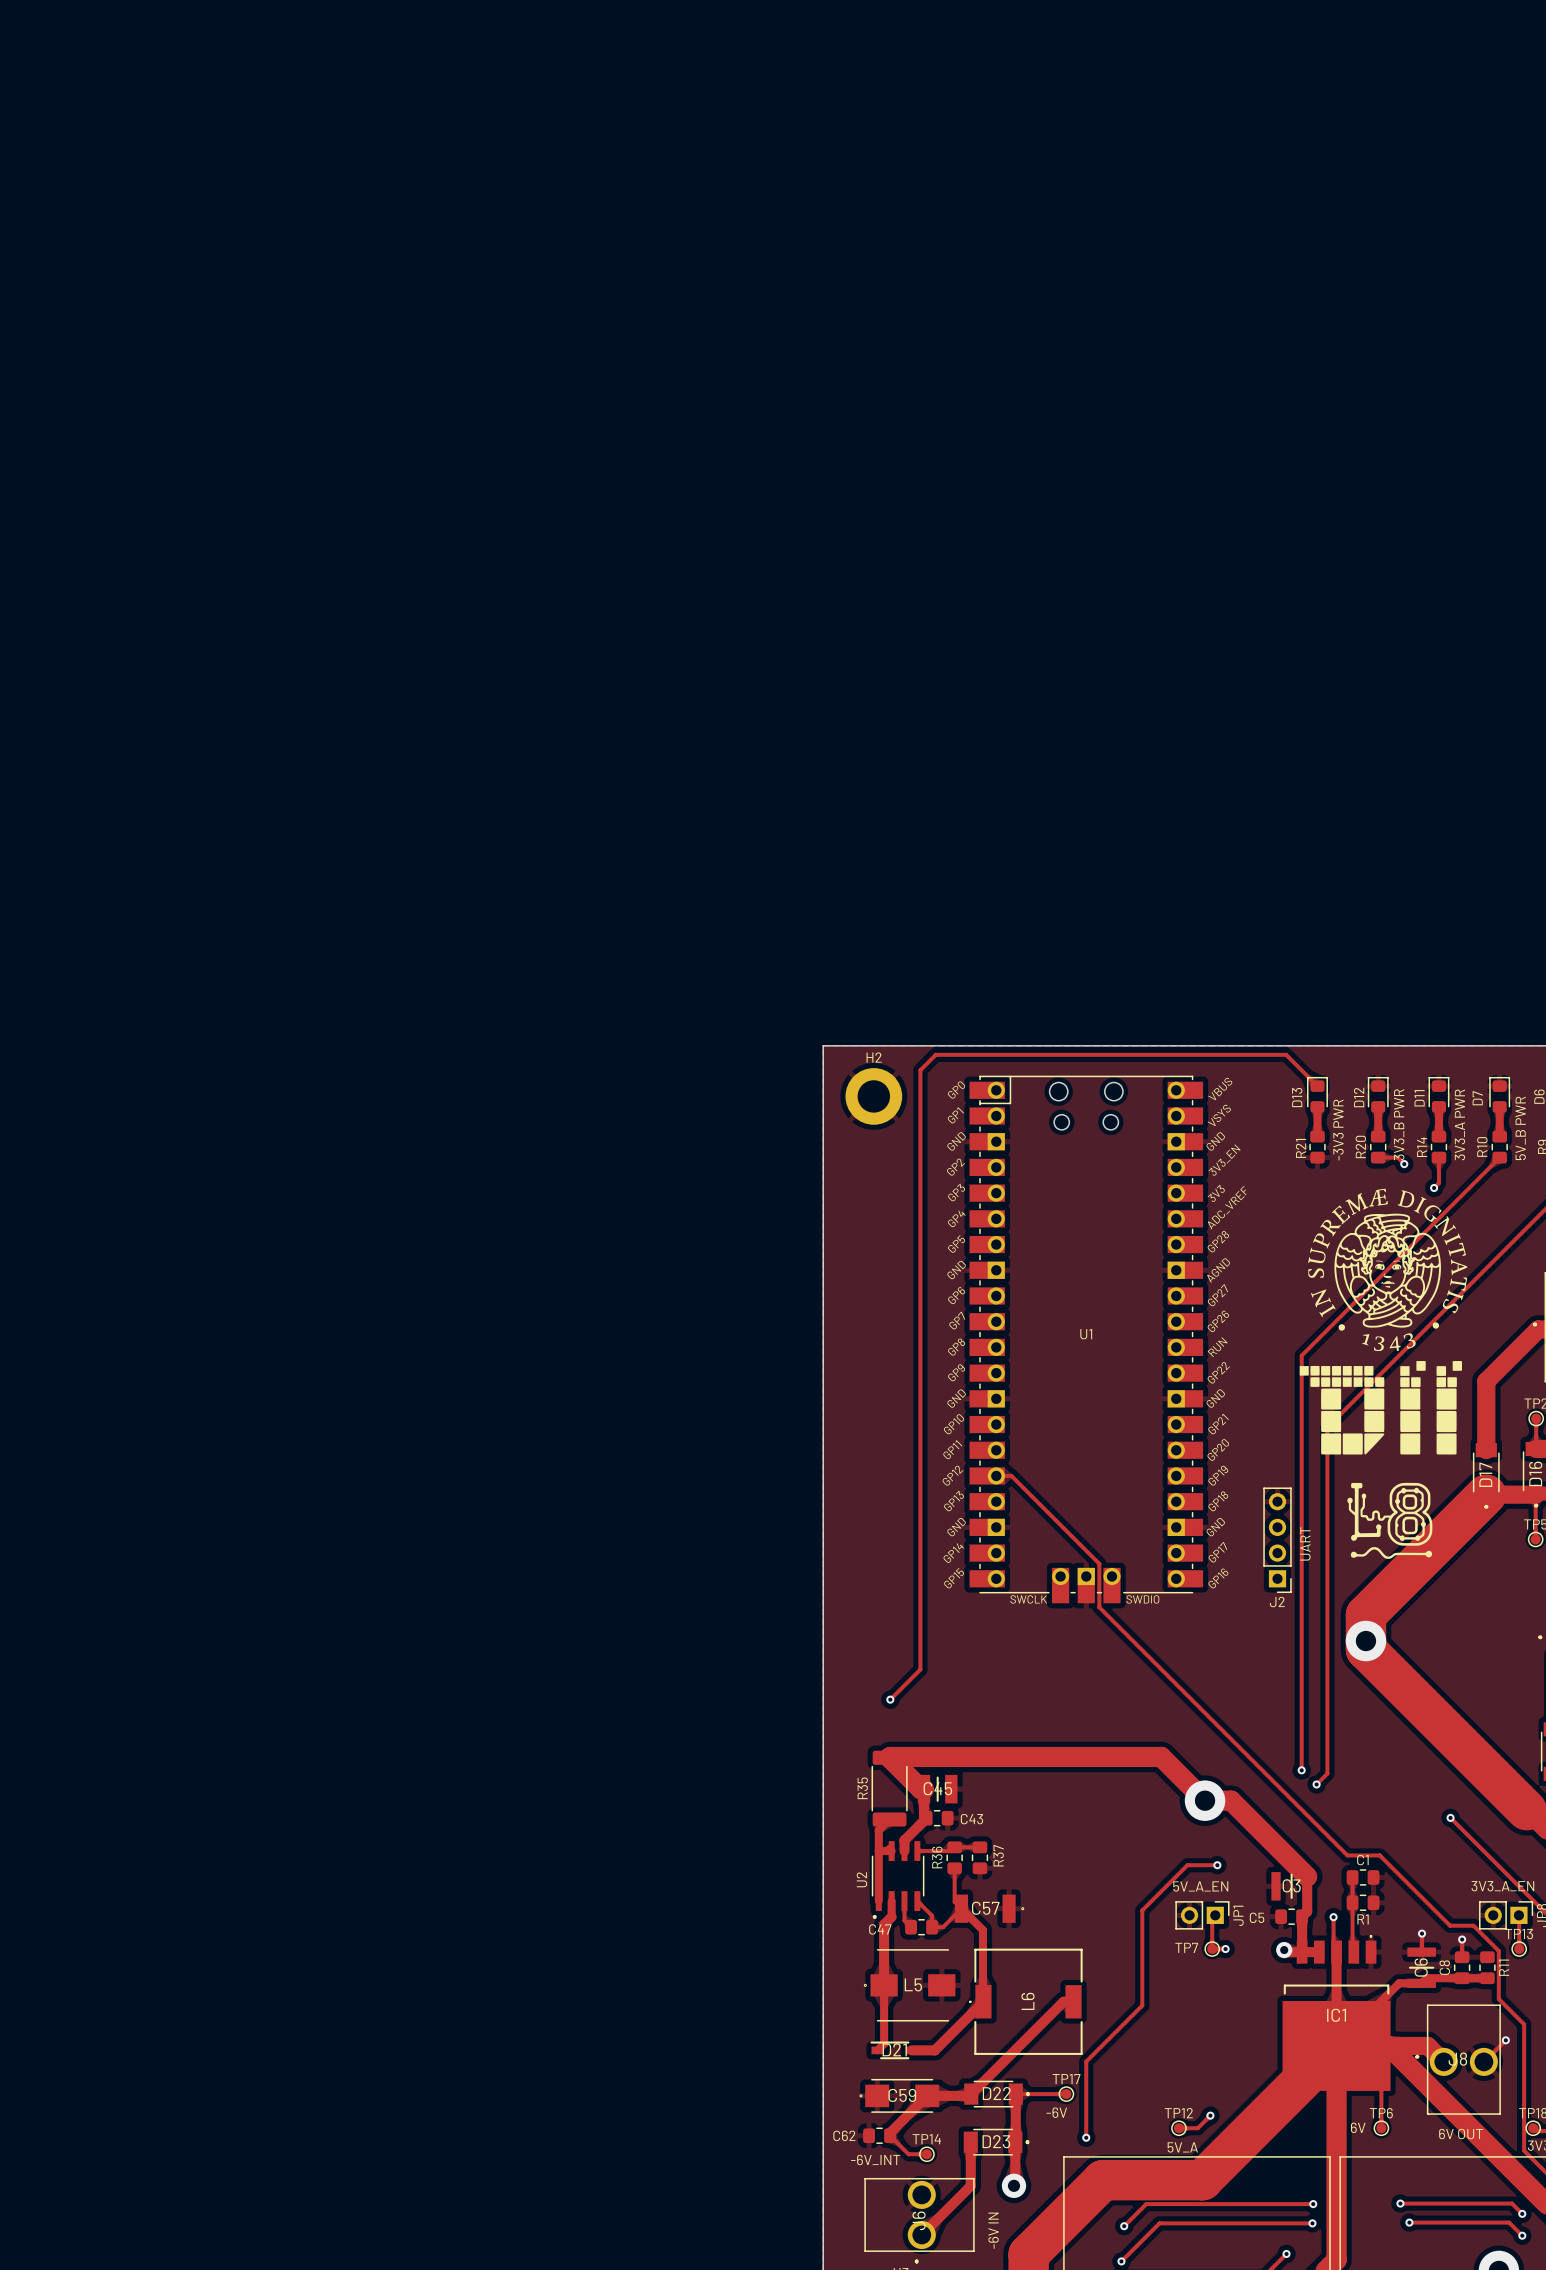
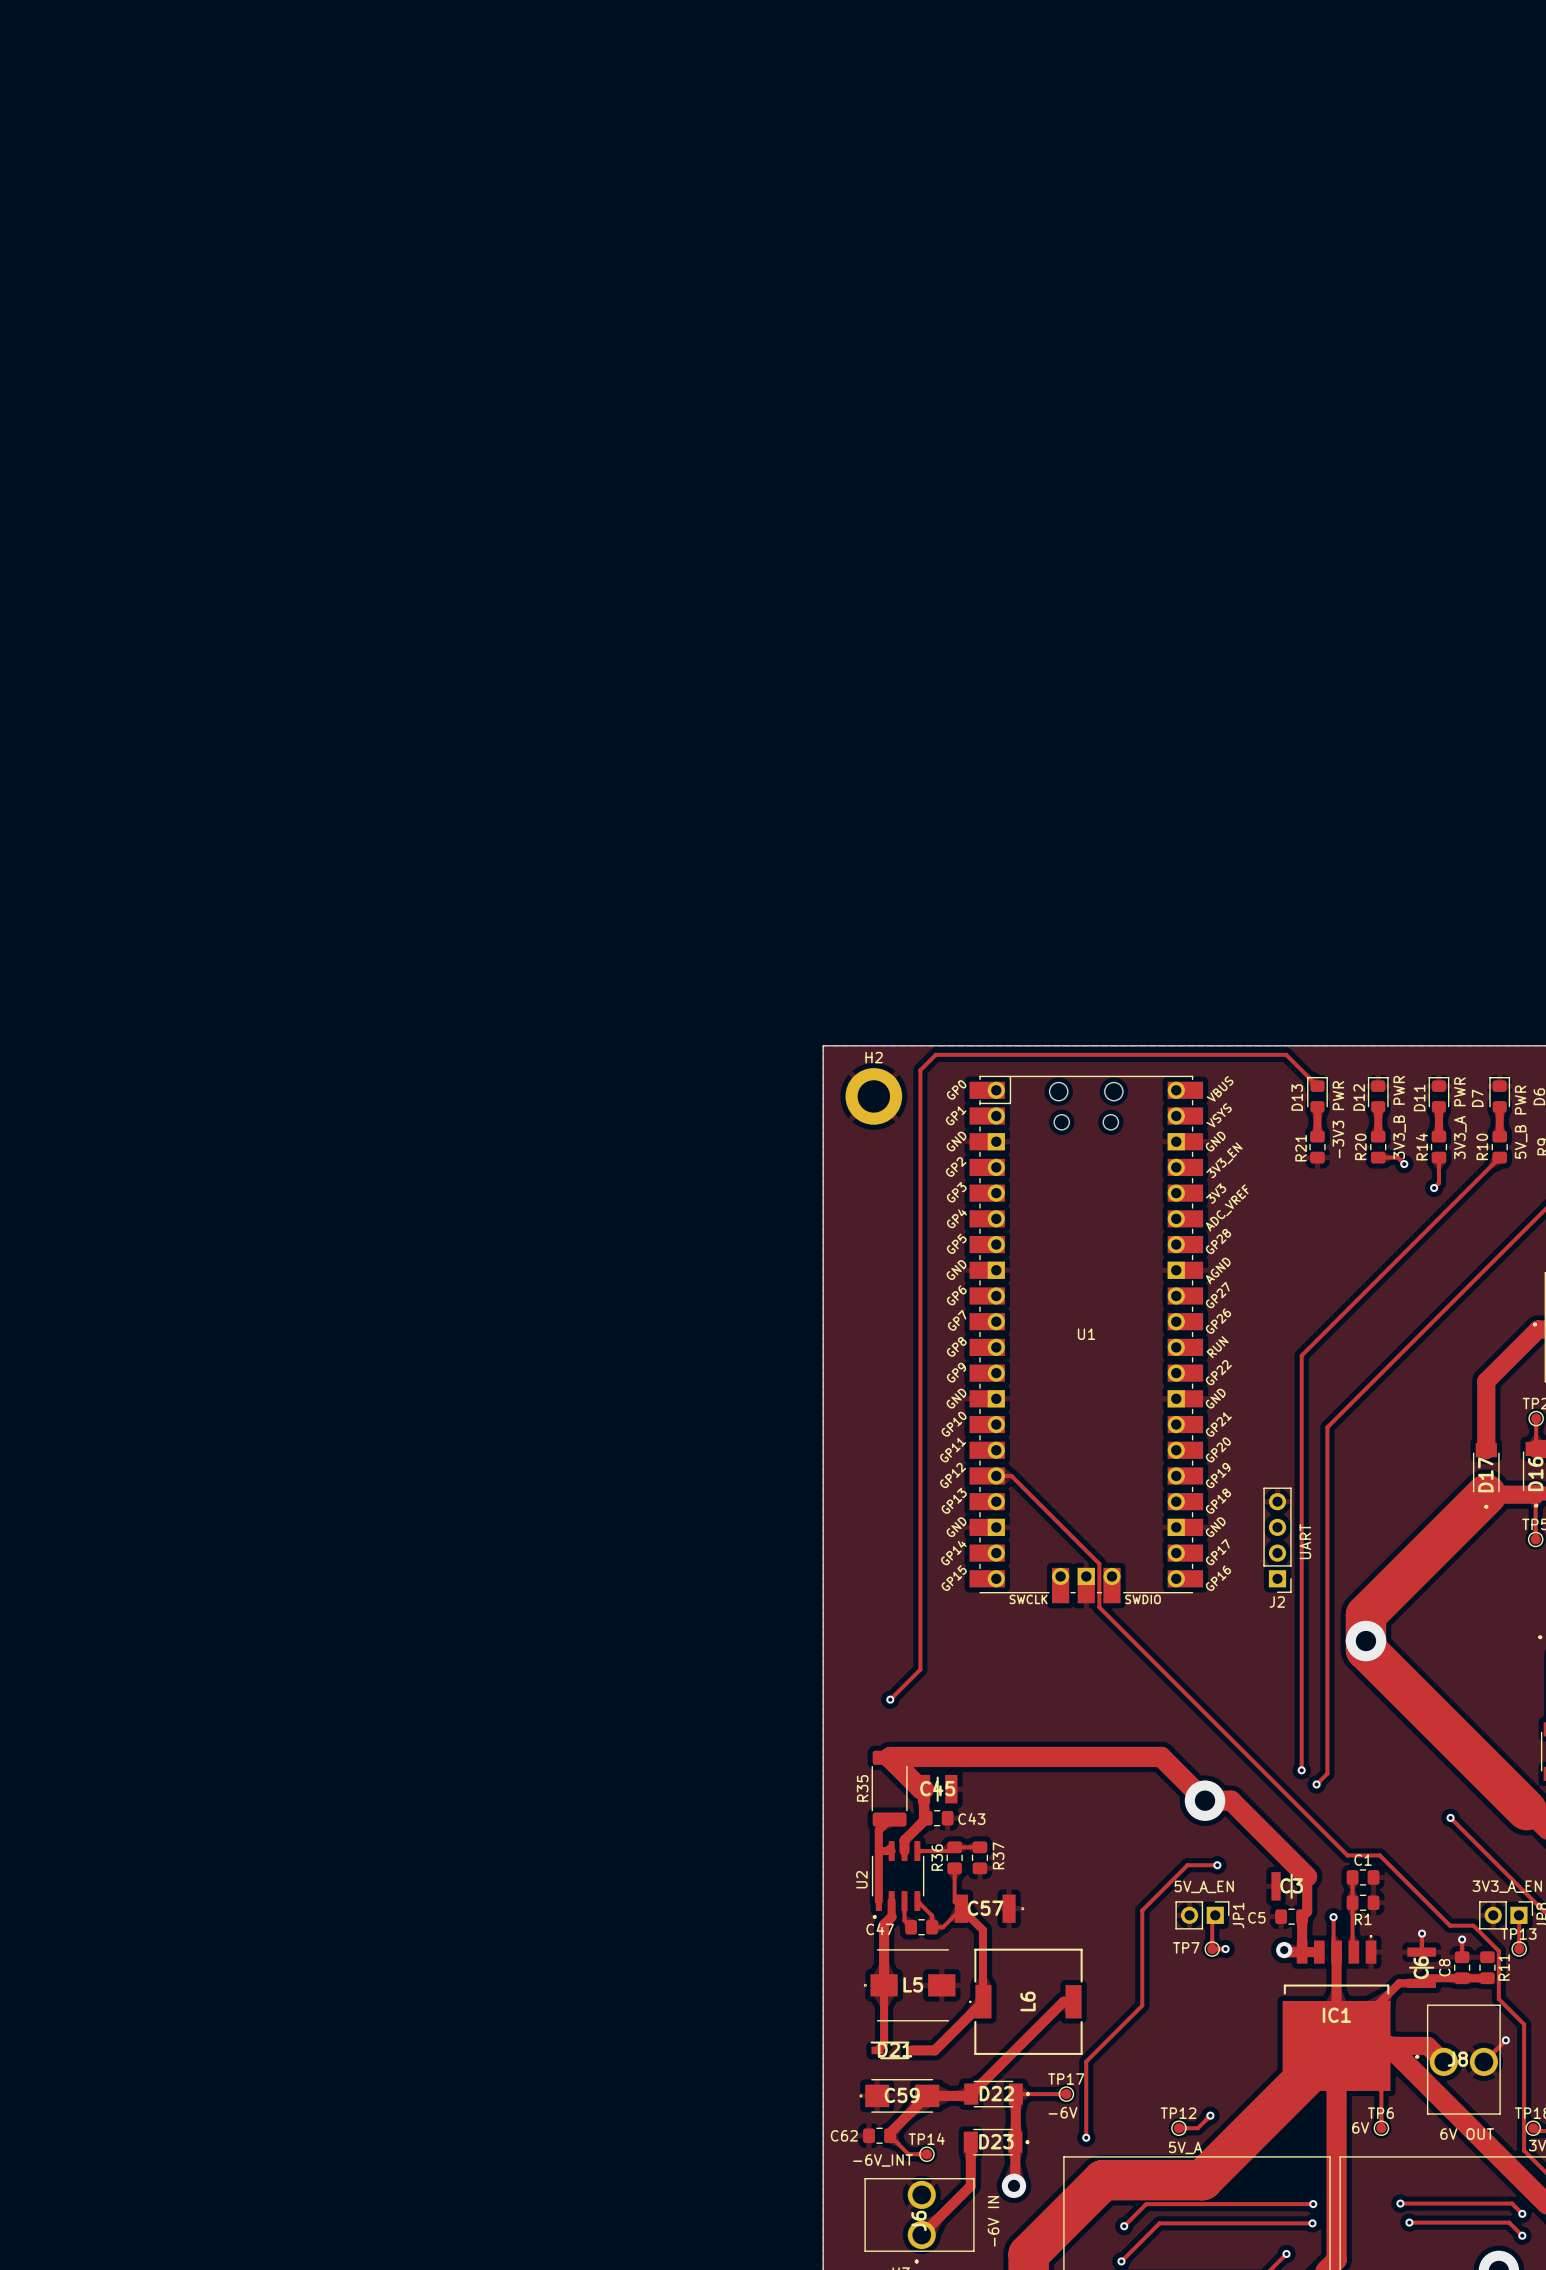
drawing: [1299, 1188, 1468, 1455] -> none
drawing: [1347, 1482, 1433, 1559] -> none

